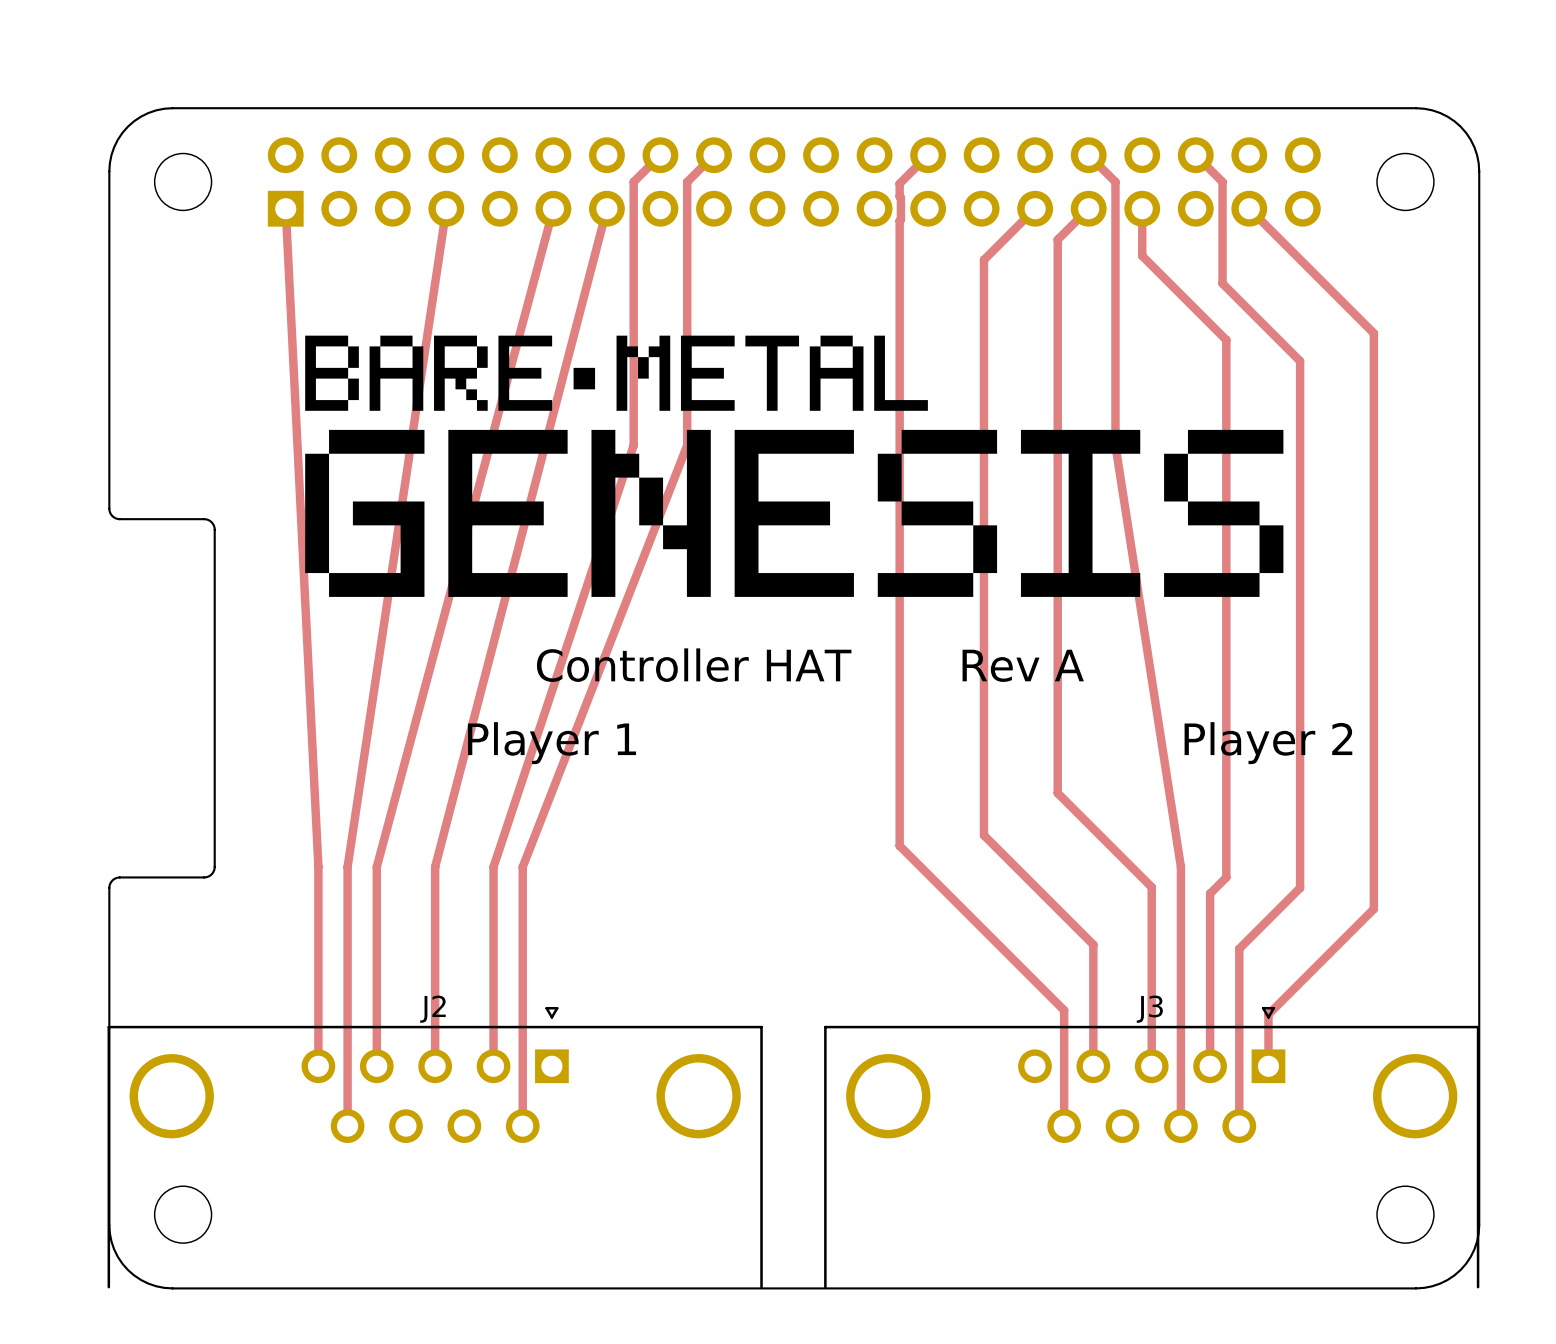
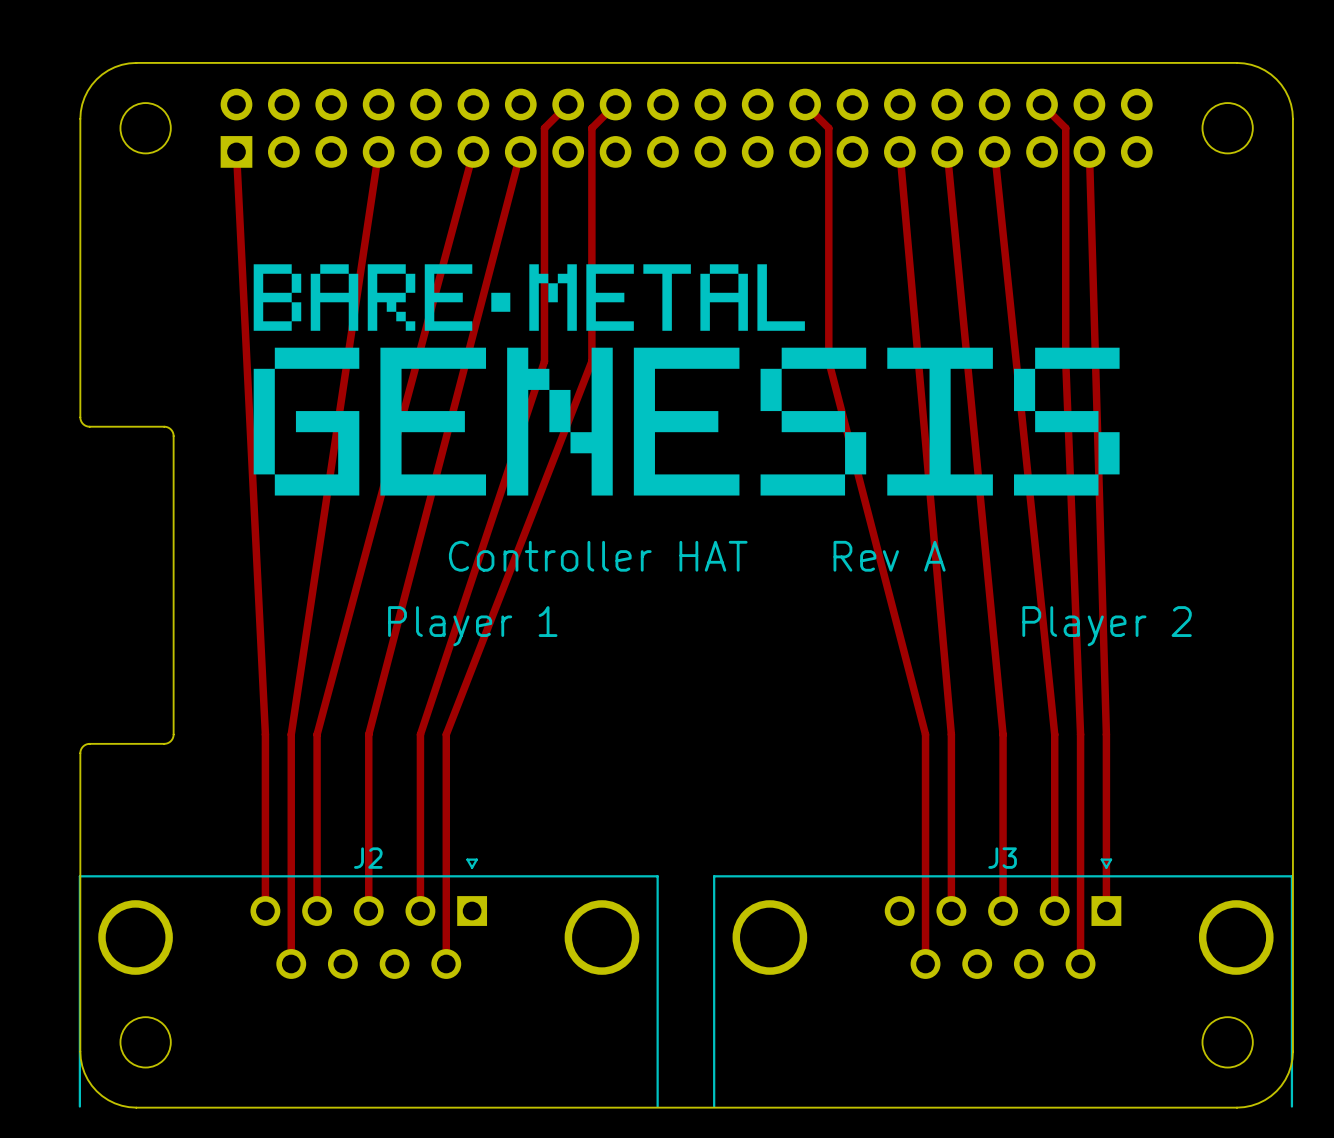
track: (928, 155) (899, 183) (899, 845) (1064, 1010) -> (805, 104) (828, 128) (828, 361) (925, 734) (925, 861)
track: (1088, 155) (1115, 181) (1115, 445) (1180, 866) (1180, 1126) -> none
track: (1035, 208) (983, 259) (983, 835) (1093, 944) -> (899, 151) (951, 734) (951, 803)
track: (1088, 208) (1057, 239) (1057, 793) (1151, 887) -> (947, 151) (1003, 734) (1003, 752)
track: (1142, 208) (1142, 255) (1226, 340) (1226, 877) (1210, 893) -> (994, 151) (1054, 734) (1054, 758)
track: (1249, 208) (1373, 333) (1373, 909) (1268, 1014) -> (1089, 151) (1106, 734) (1106, 865)
track: (1222, 283) (1300, 361) (1300, 887) (1239, 948) -> (1065, 218) (1065, 361) (1080, 734) (1080, 807)

